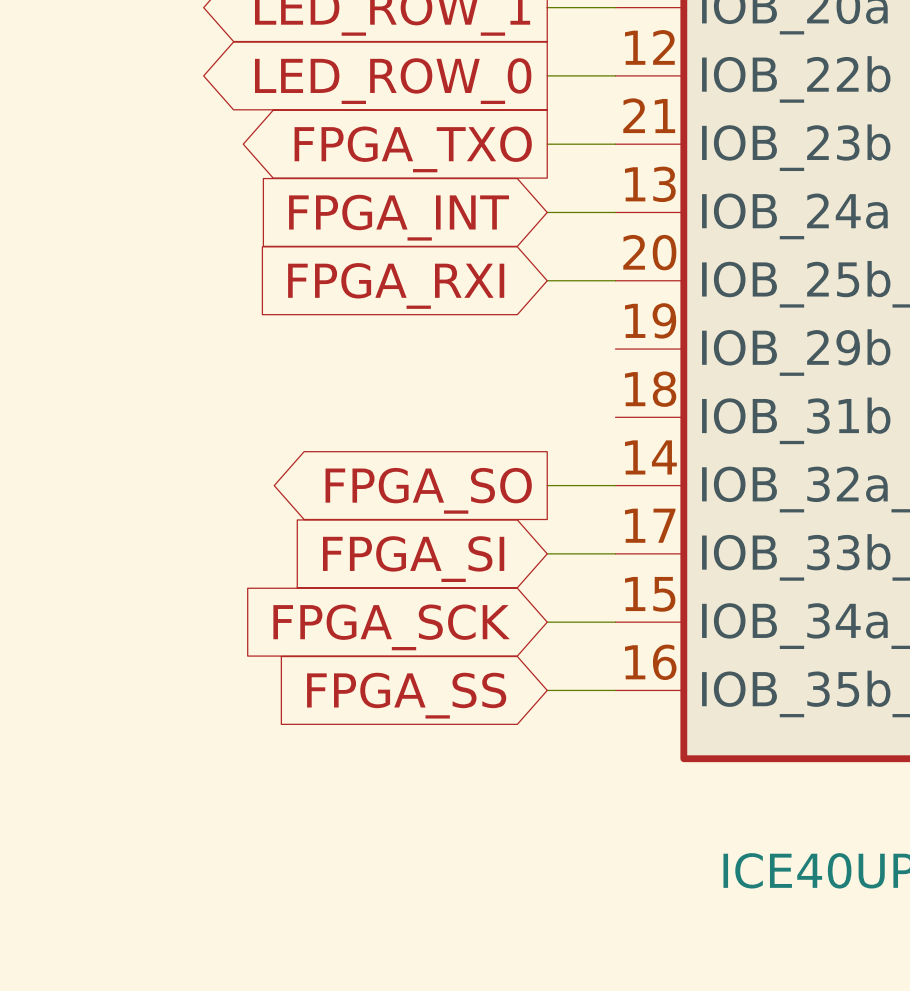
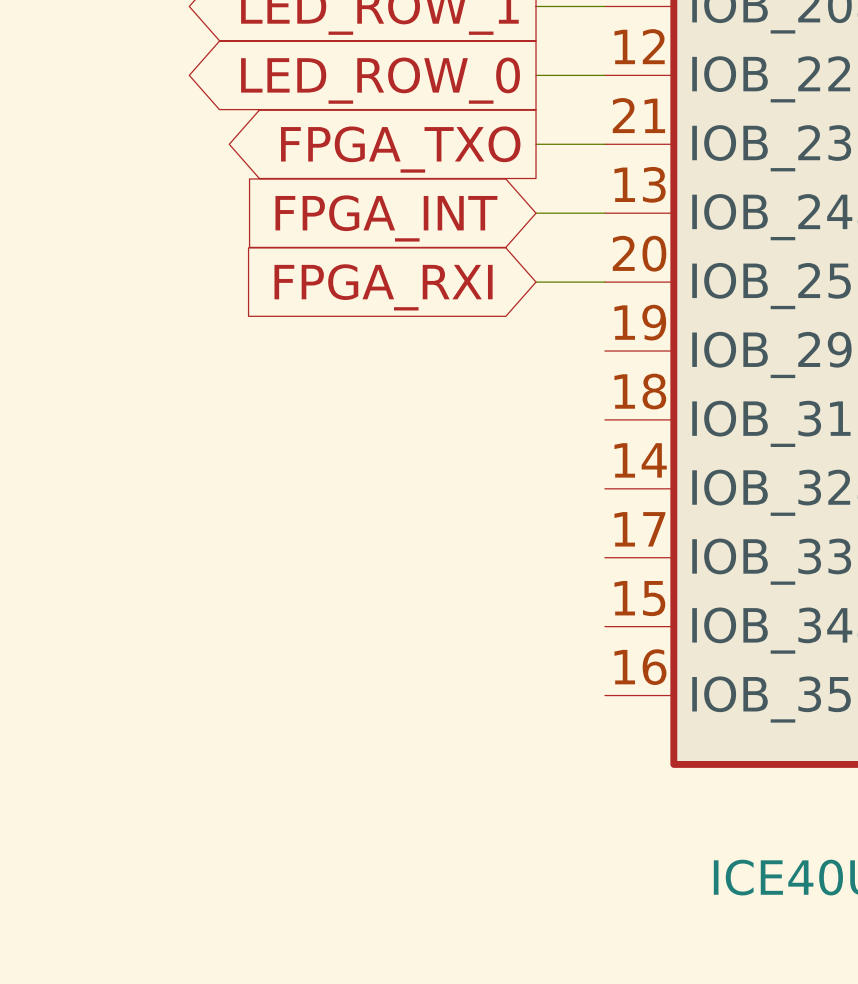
wire: (547, 485) (615, 485) -> none
global label: FPGA_SO (428, 490) -> none
wire: (547, 553) (615, 553) -> none
global label: FPGA_SI (413, 559) -> none
wire: (547, 622) (615, 622) -> none
global label: FPGA_SCK (391, 627) -> none
wire: (547, 690) (615, 690) -> none
global label: FPGA_SS (406, 695) -> none

